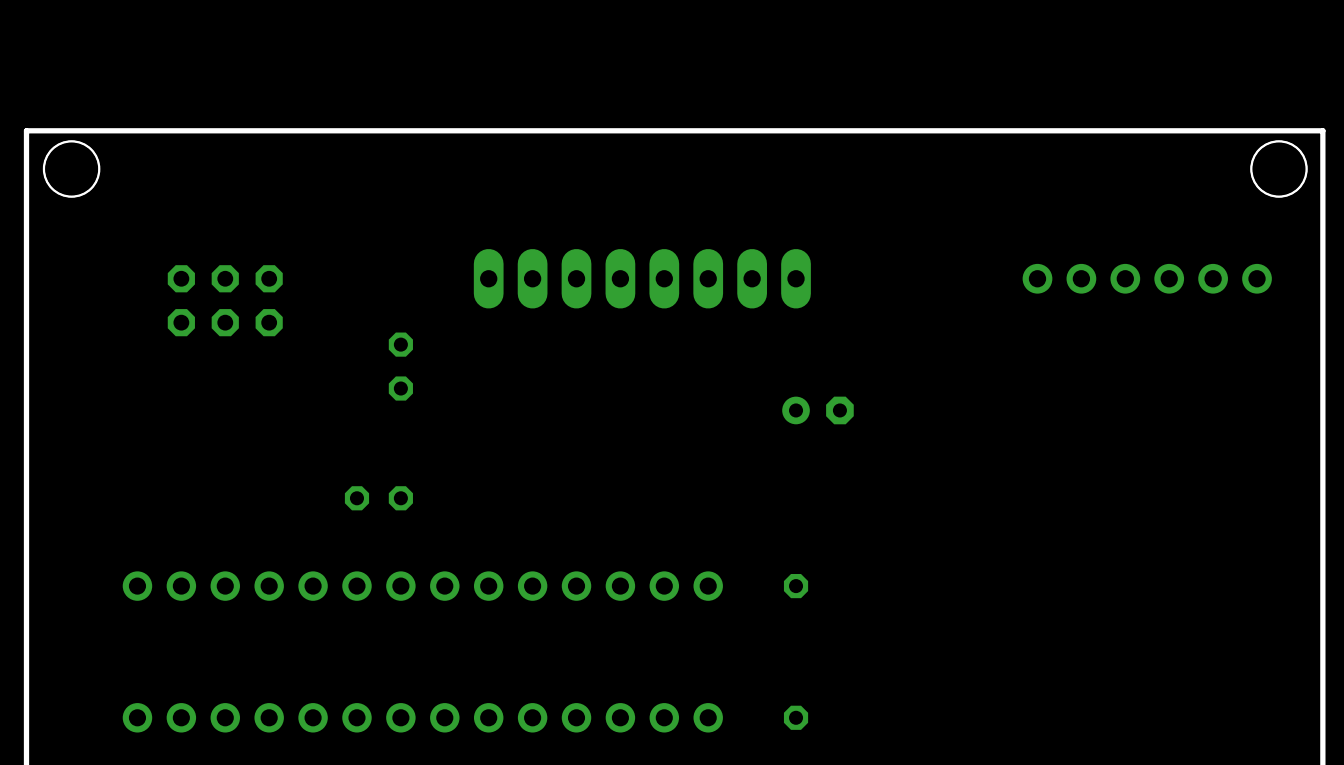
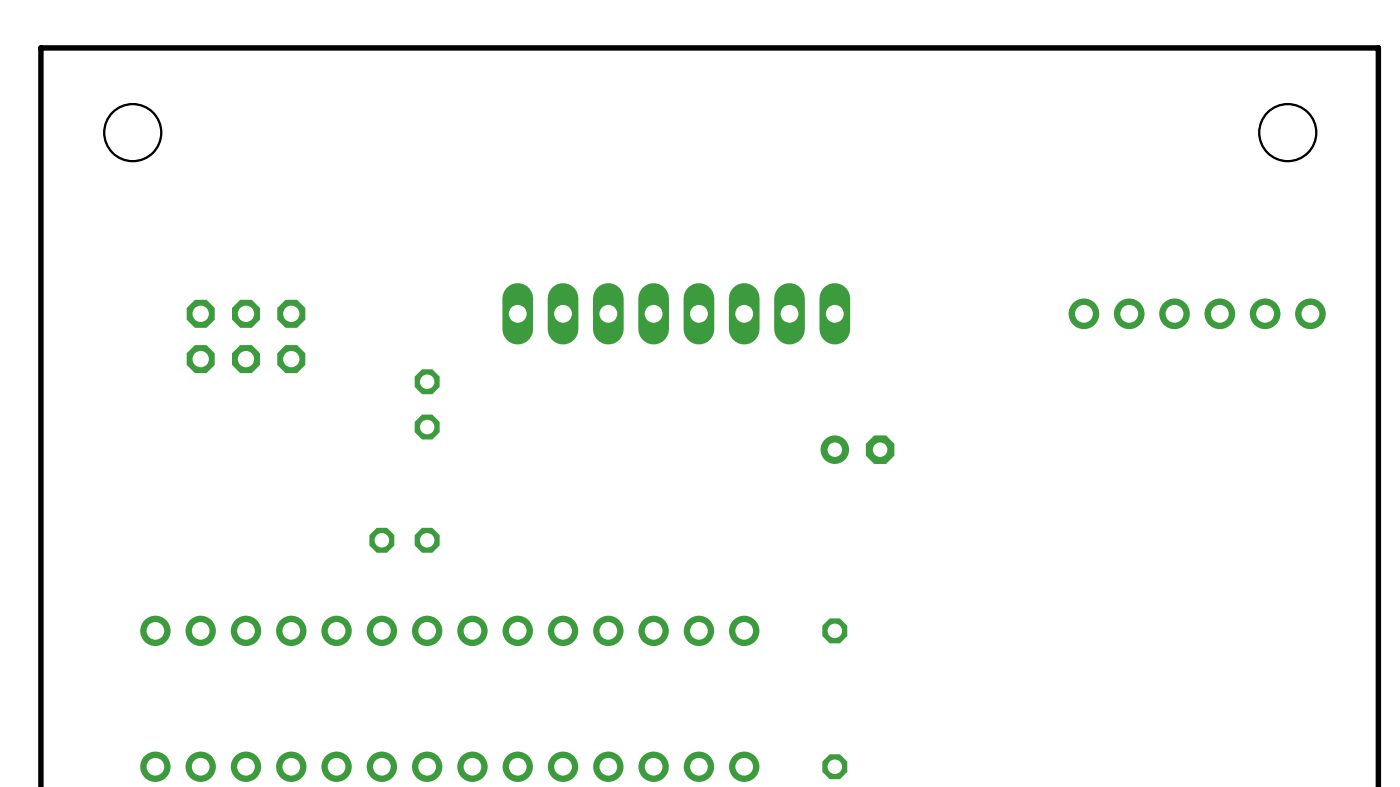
board edge: (1322, 130) (26, 130) -> (1378, 161) (1378, 47) (40, 47) (40, 161)
round board edge position: (71, 168) -> (132, 132)
round board edge position: (1278, 168) -> (1287, 132)

